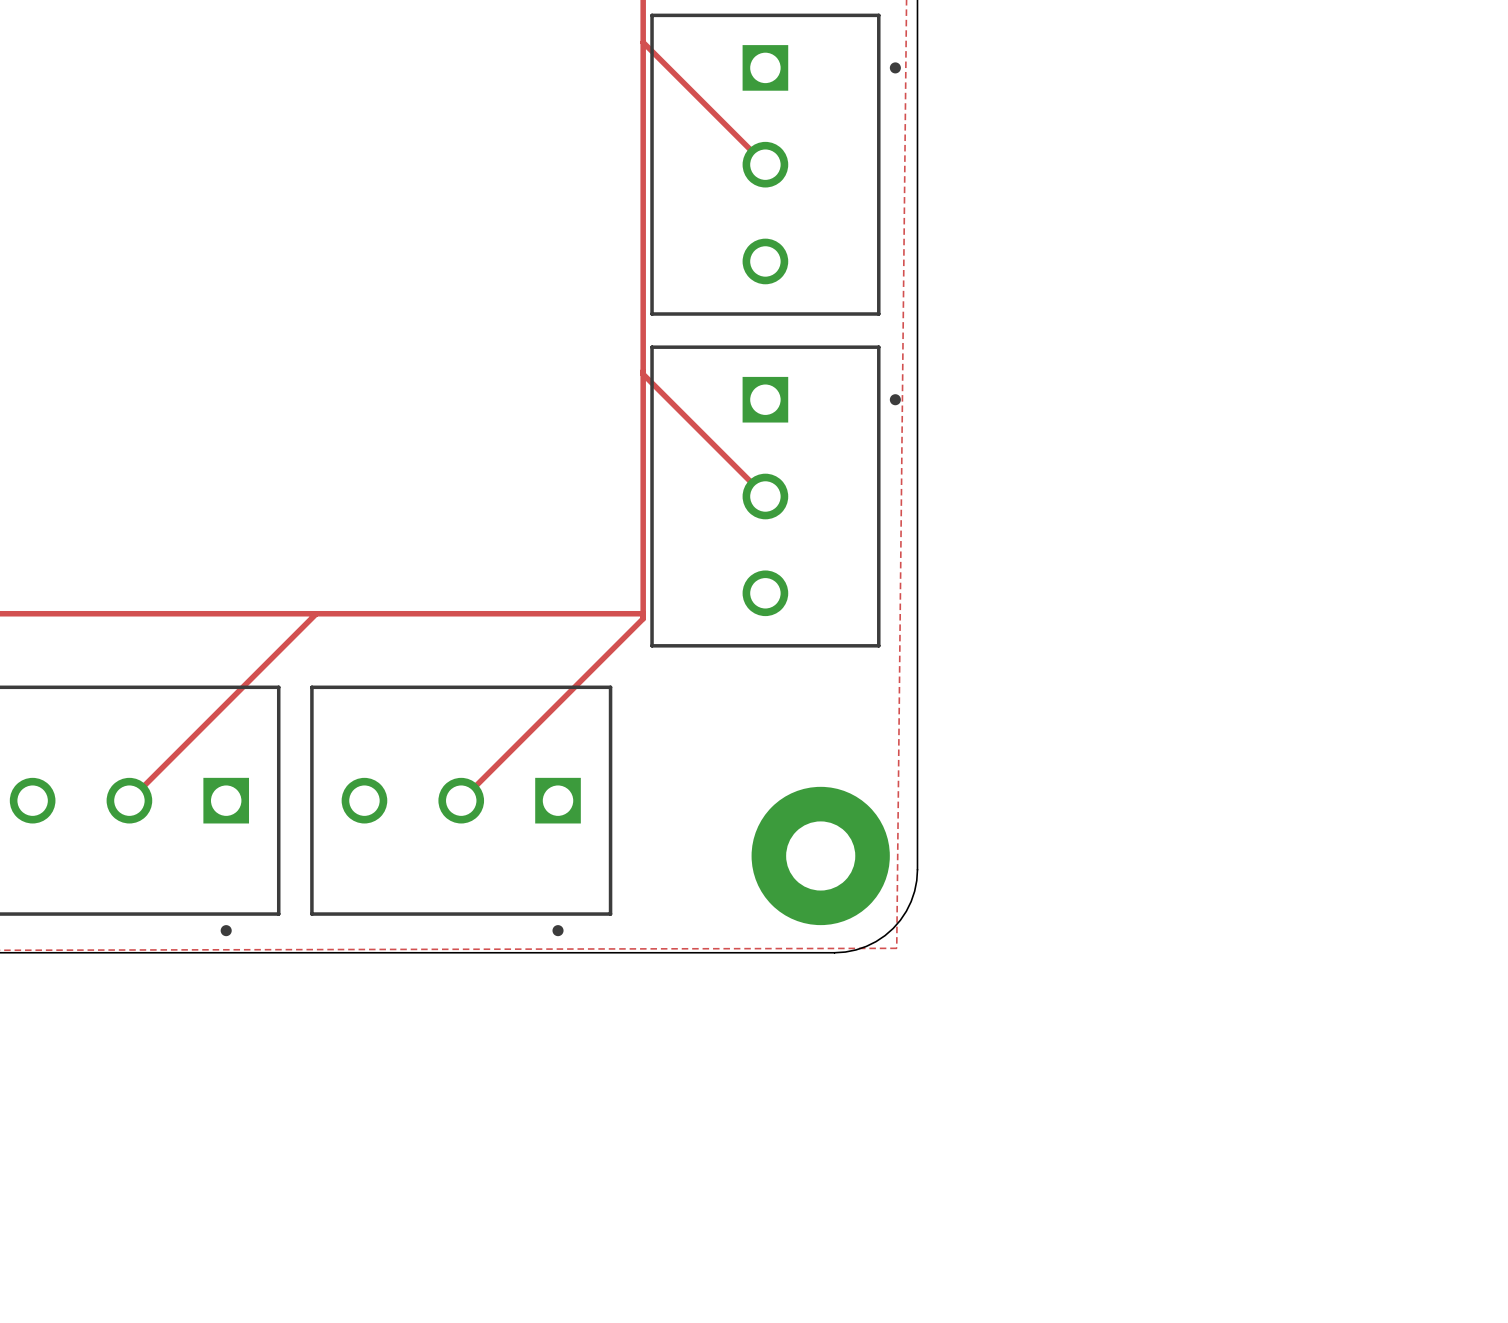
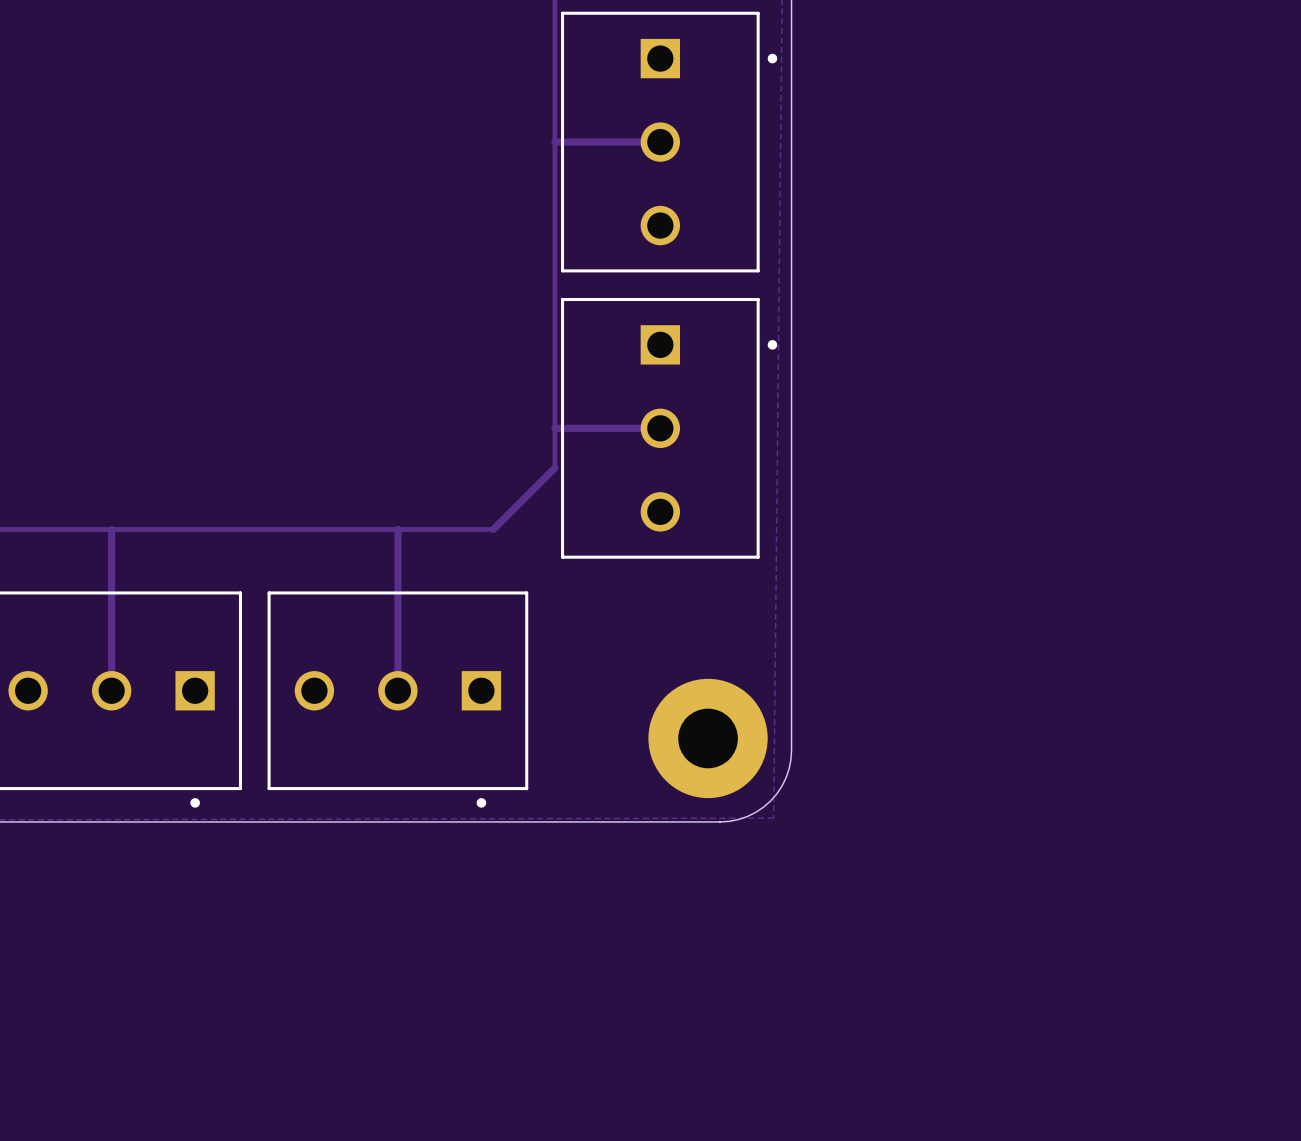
track: (643, 42) (765, 164) -> (554, 142) (660, 142)
track: (643, 374) (765, 496) -> (554, 428) (660, 428)
track: (643, 542) (643, 618) (461, 800) -> (397, 529) (397, 690)
track: (316, 613) (129, 800) -> (111, 529) (111, 690)
track: (571, 613) (643, 613) -> (493, 529) (554, 467)

